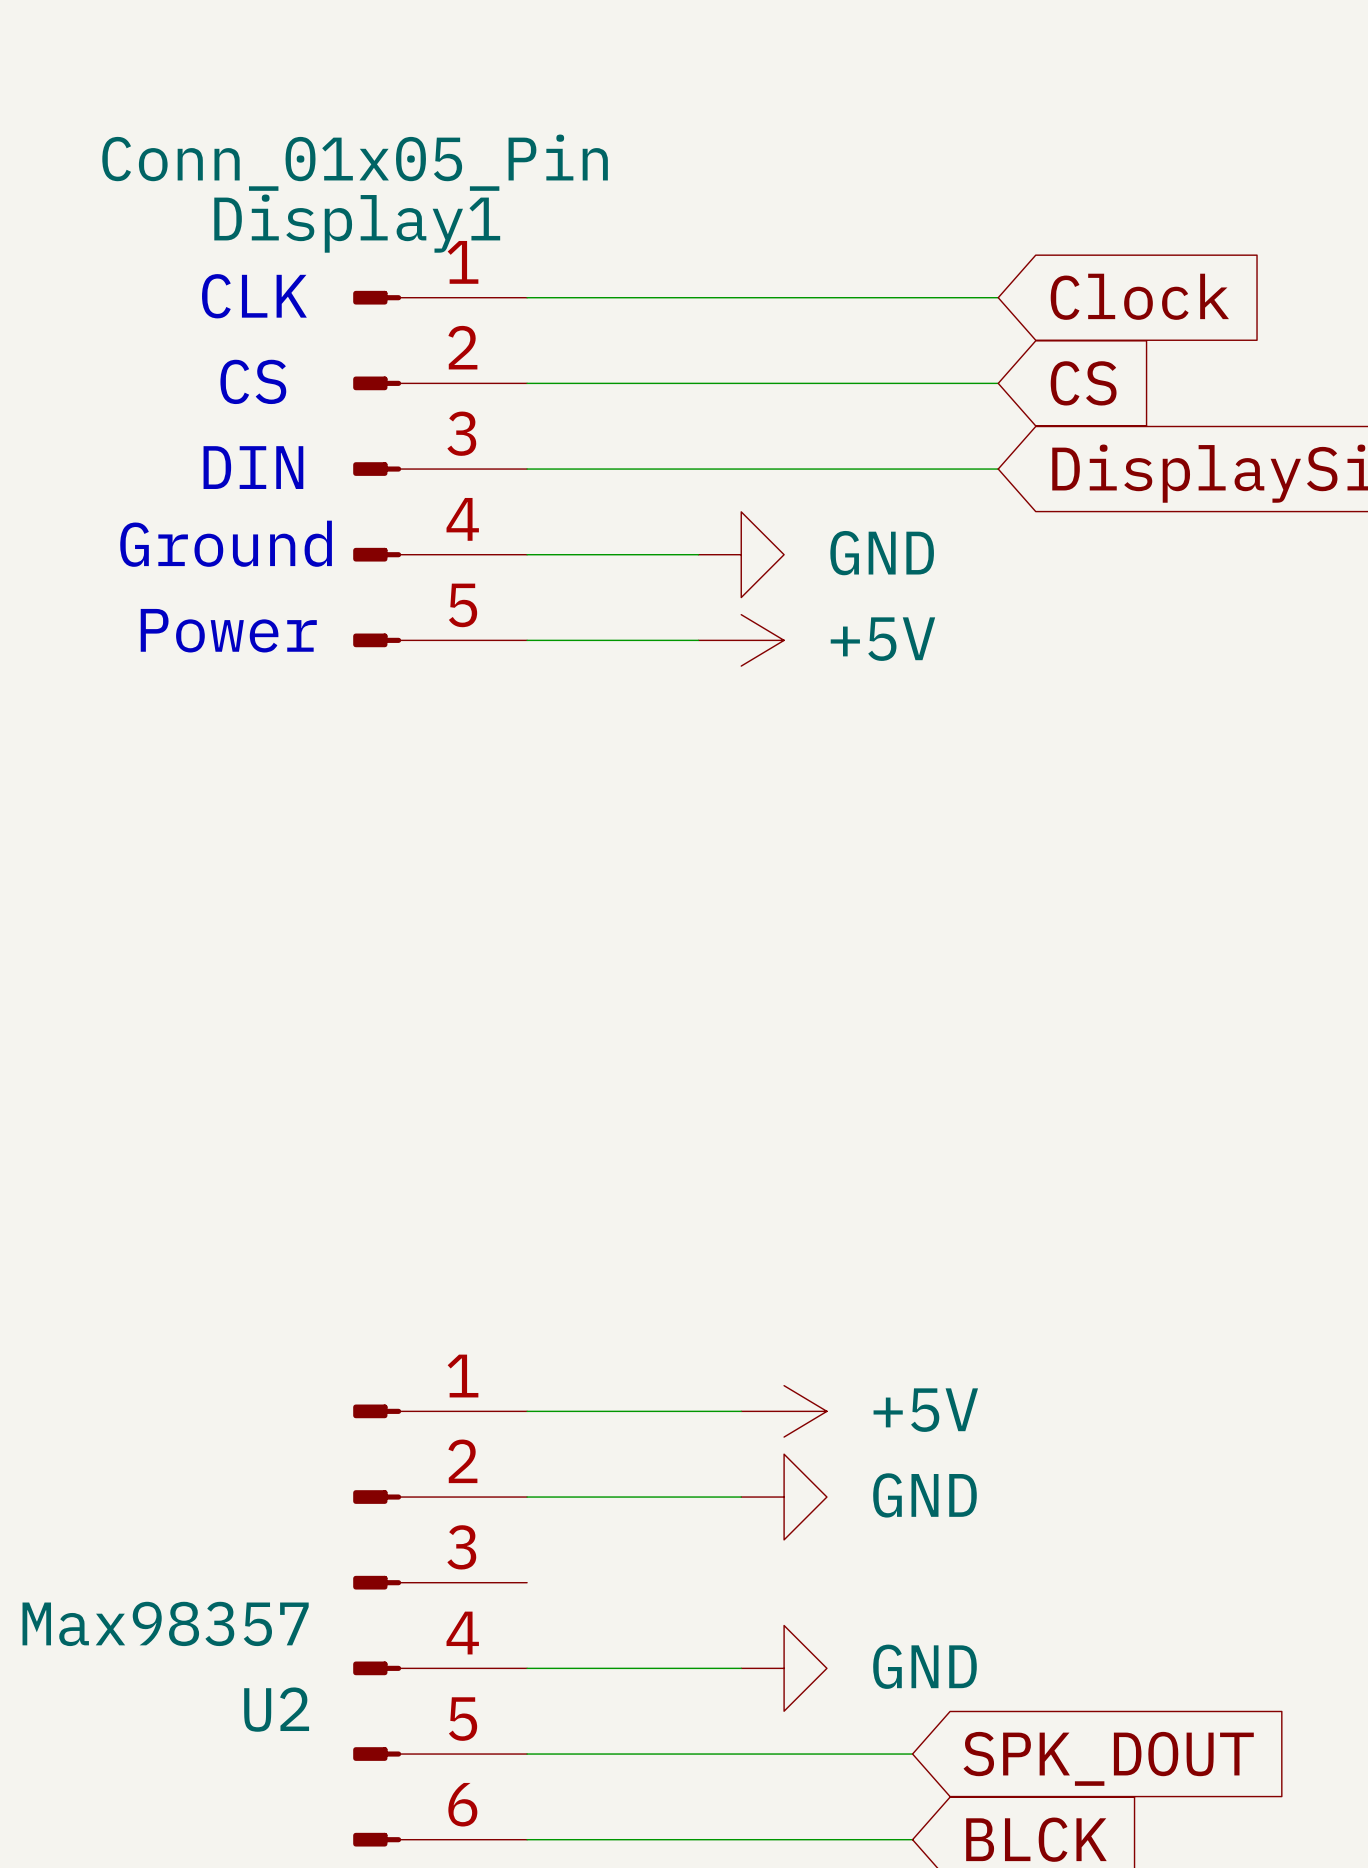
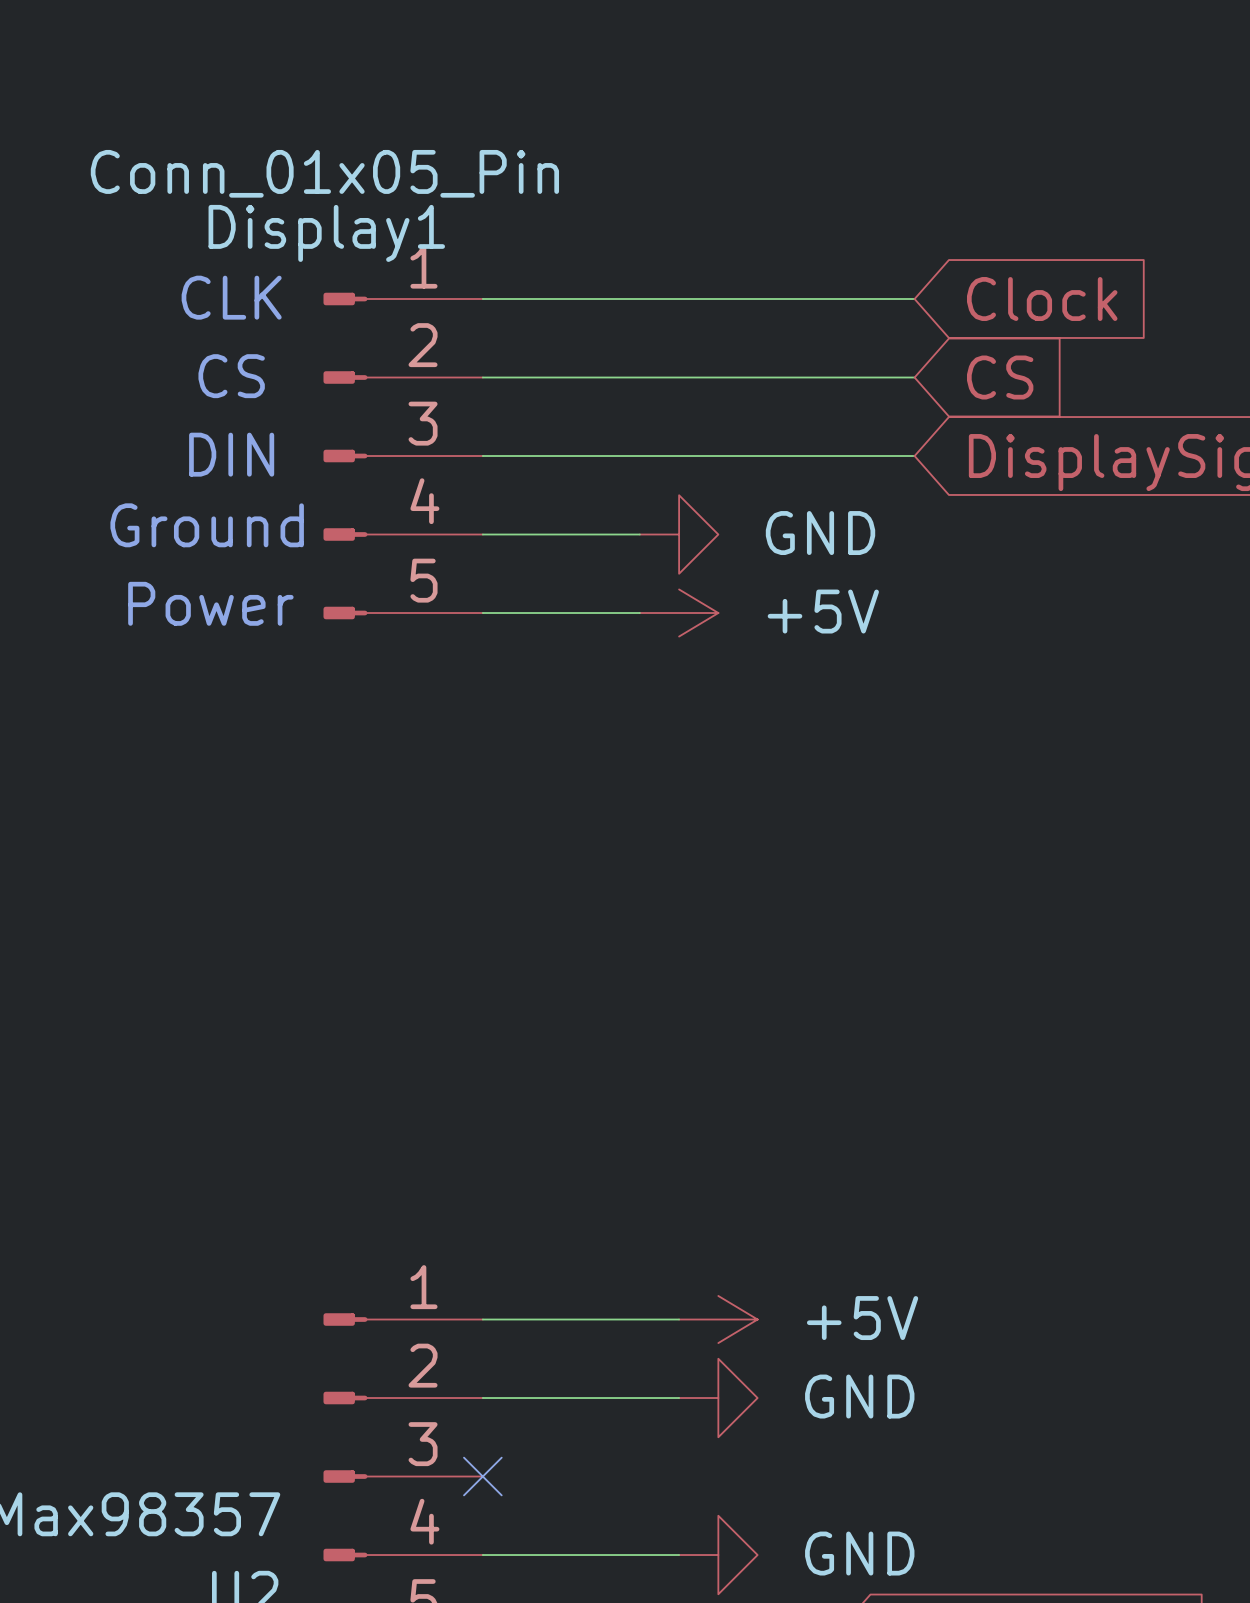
no-connect mark: none -> (482, 1476)

